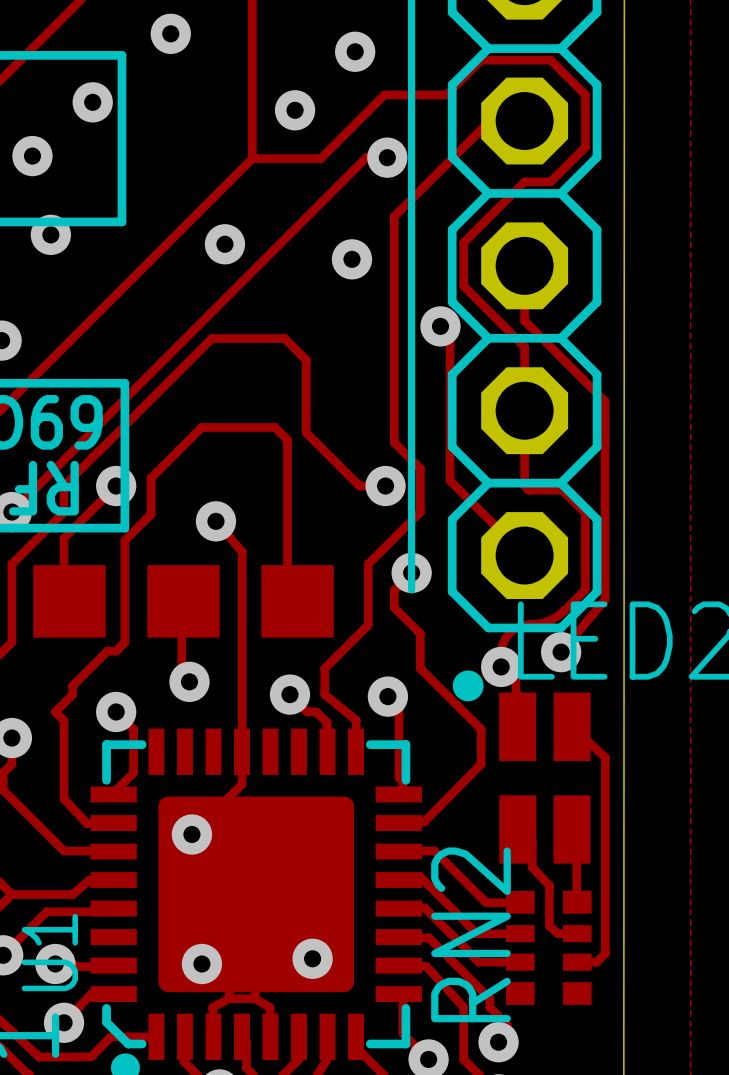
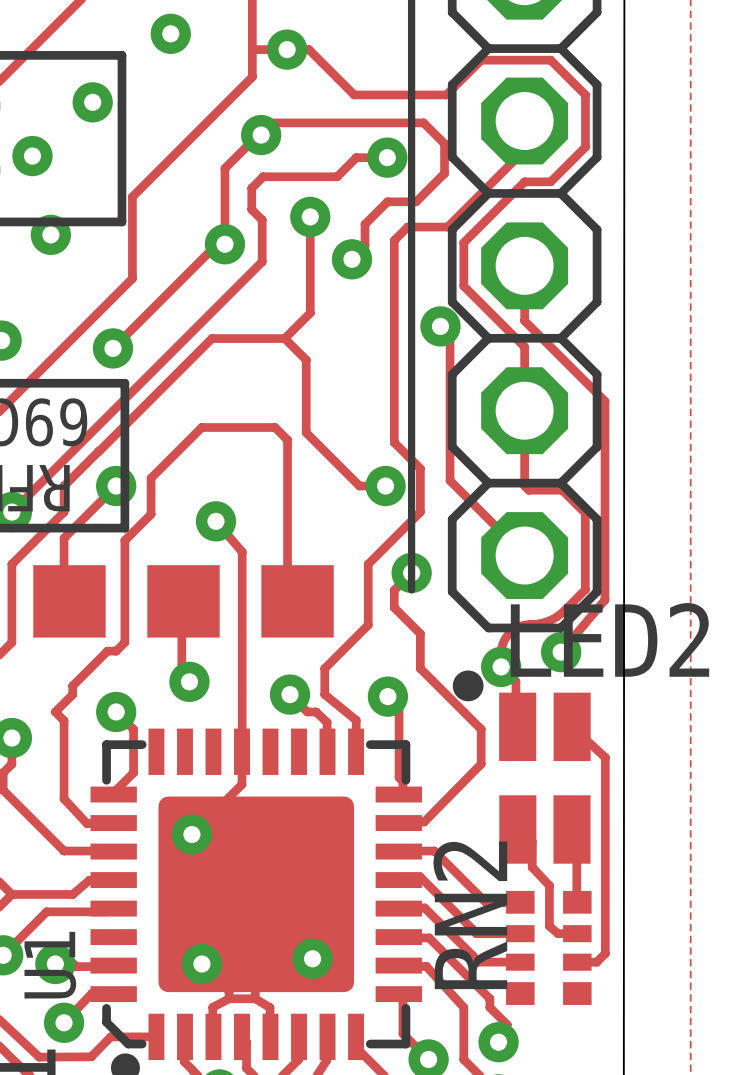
via: none -> (287, 49)
via: (355, 51) -> none
track: (252, 76) (252, 158) -> none
track: (384, 94) (320, 158) (252, 158) -> (384, 94) (354, 94) (308, 49) (252, 50)
via position: (295, 110) -> (261, 135)
track: (489, 121) (394, 216) (394, 240) -> (524, 121) (524, 150) (447, 227) (407, 227) (394, 240)
track: (366, 157) (262, 261) -> (366, 157) (356, 157) (337, 176) (263, 176) (251, 188) (251, 209) (262, 220) (262, 261)
track: (252, 158) (132, 278) -> (252, 76) (132, 196) (132, 278)
track: none -> (310, 216) (310, 313) (284, 338)
via: none -> (310, 216)
track: none -> (351, 259) (365, 246) (365, 224) (387, 201) (416, 201) (444, 173) (444, 143) (423, 122) (270, 122) (224, 168) (224, 244) (217, 244) (113, 348)
via: none -> (113, 348)

